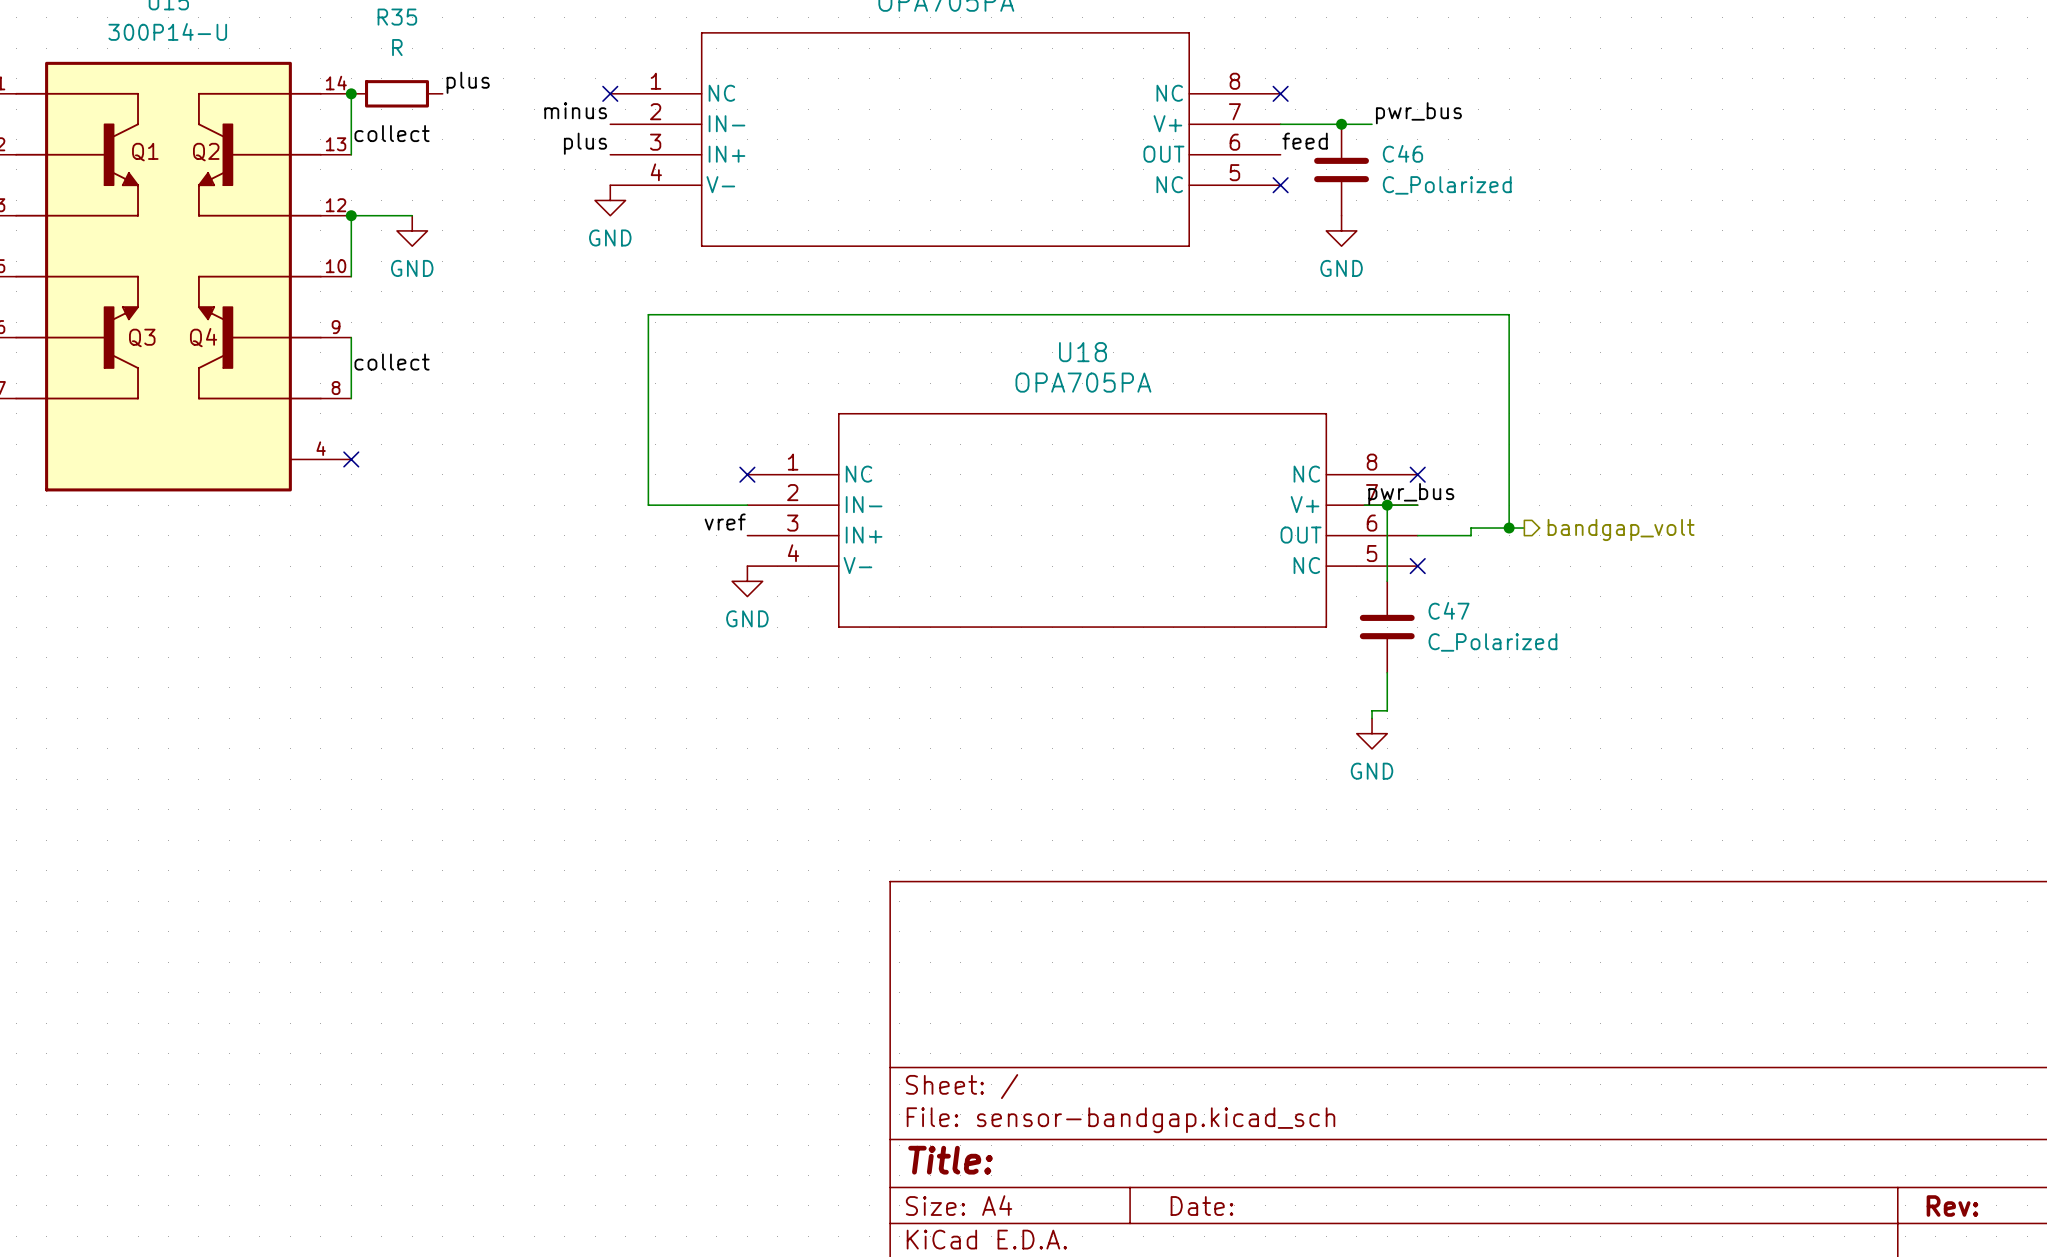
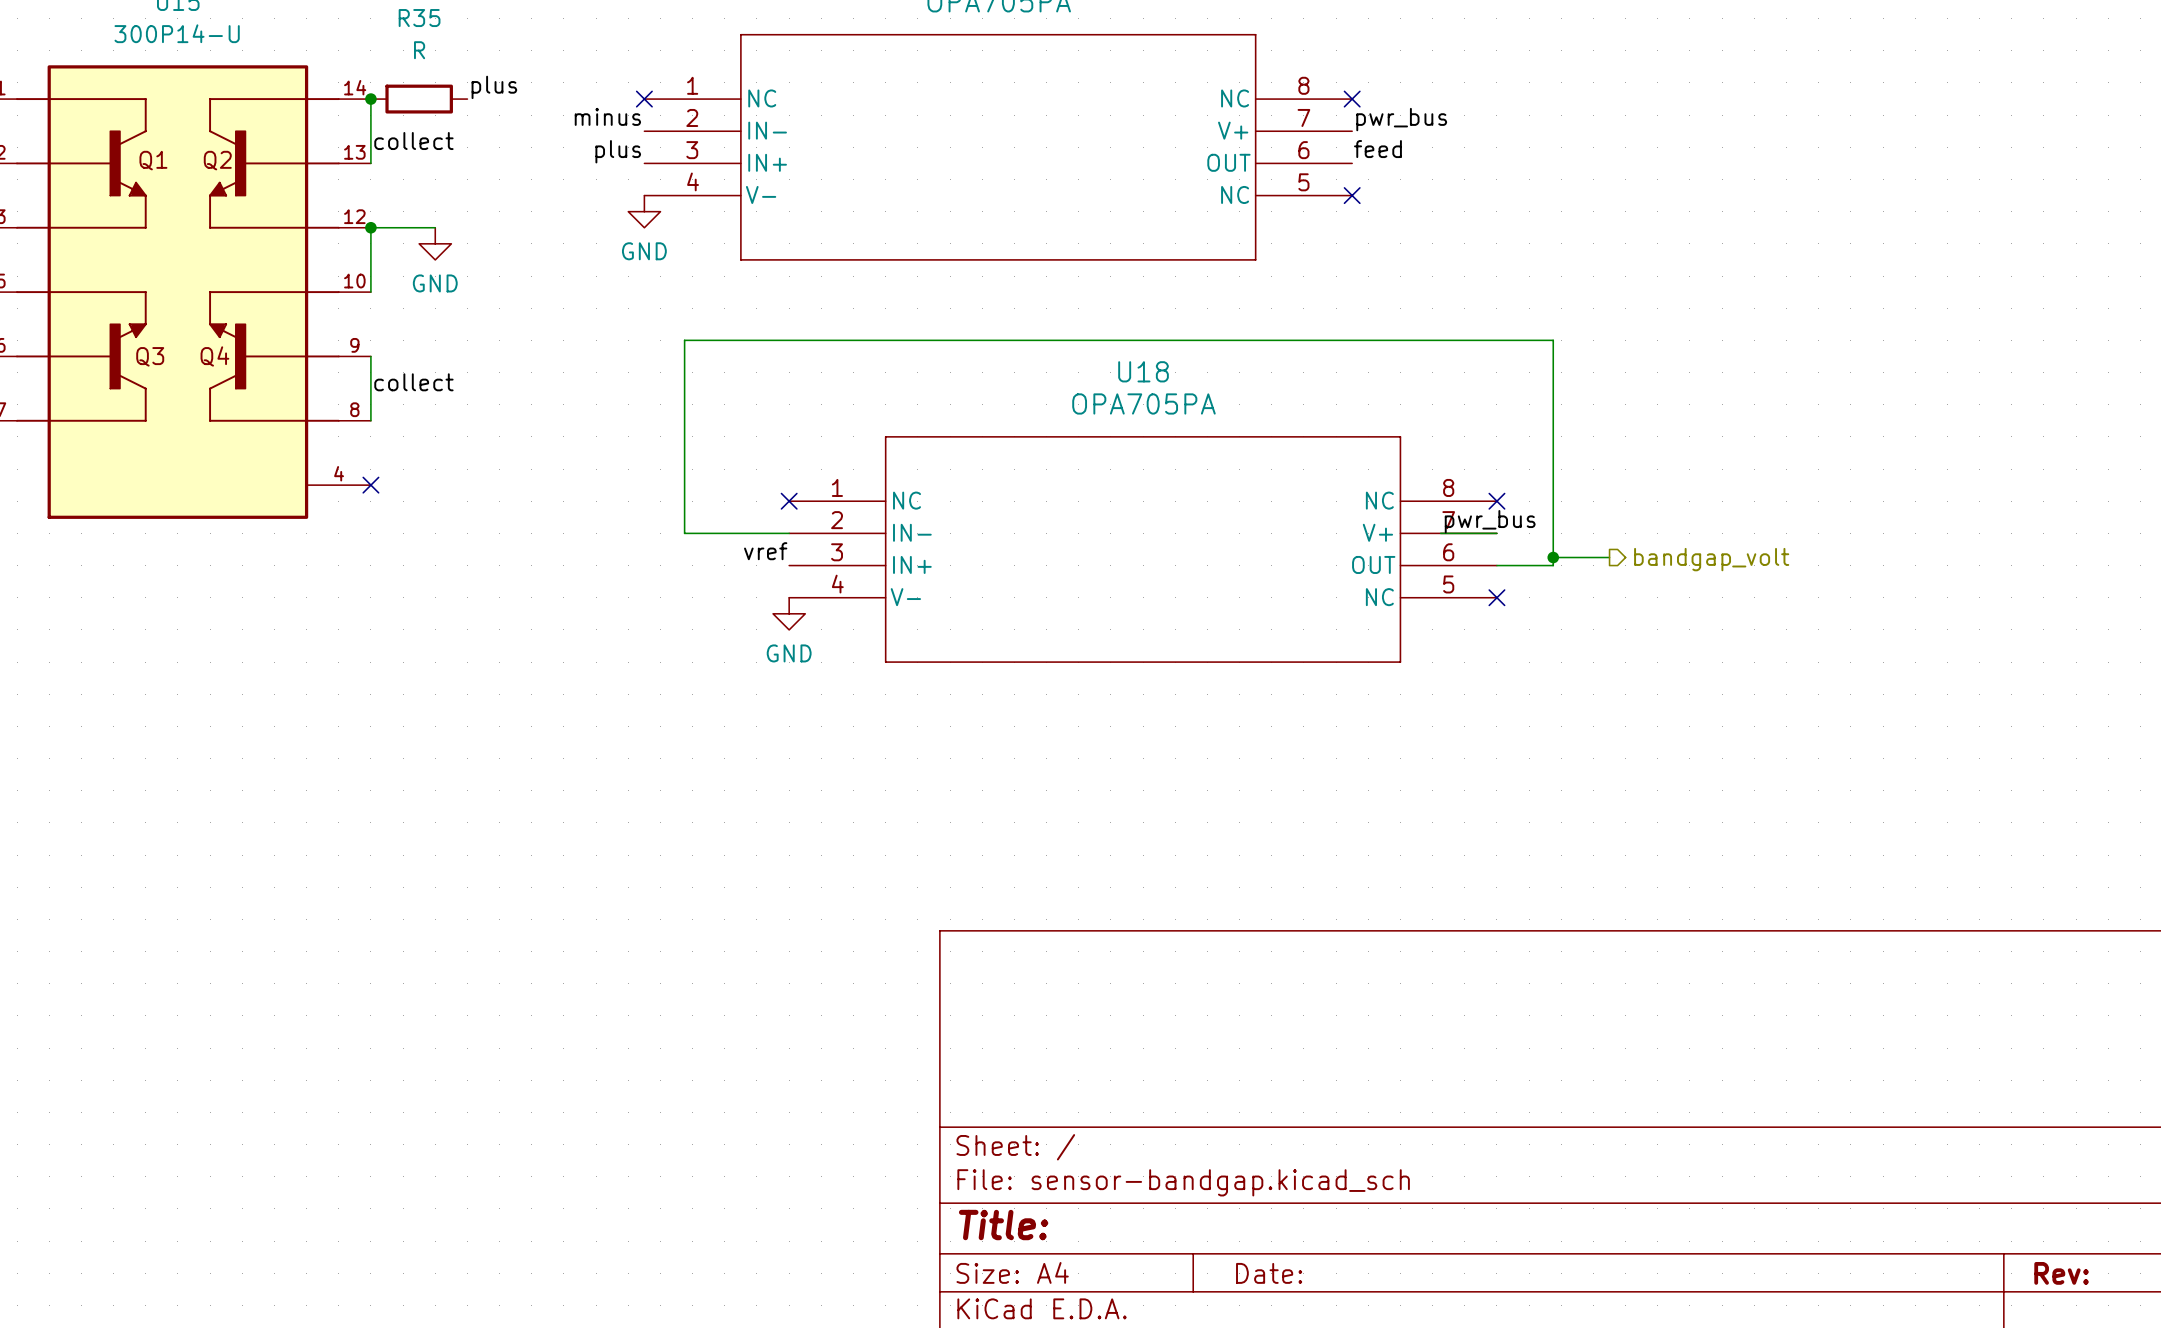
label position: pwr_bus (1418, 113) -> pwr_bus (1401, 119)
wire: (1280, 124) (1372, 124) -> none
junction: (1341, 124) -> none
C46: C_Polarized (1341, 169) -> none
power symbol: GND (1341, 230) -> none
wire: (648, 322) (648, 314) (1509, 314) (1509, 528) -> (684, 340) (1553, 340) (1553, 557)
wire: (1387, 505) (1387, 581) -> none
junction: (1387, 505) -> none
junction position: (1509, 528) -> (1553, 557)
C47: C_Polarized (1387, 627) -> none
wire: (1387, 672) (1387, 710) (1372, 710) (1372, 718) -> none
power symbol: GND (1372, 733) -> none

